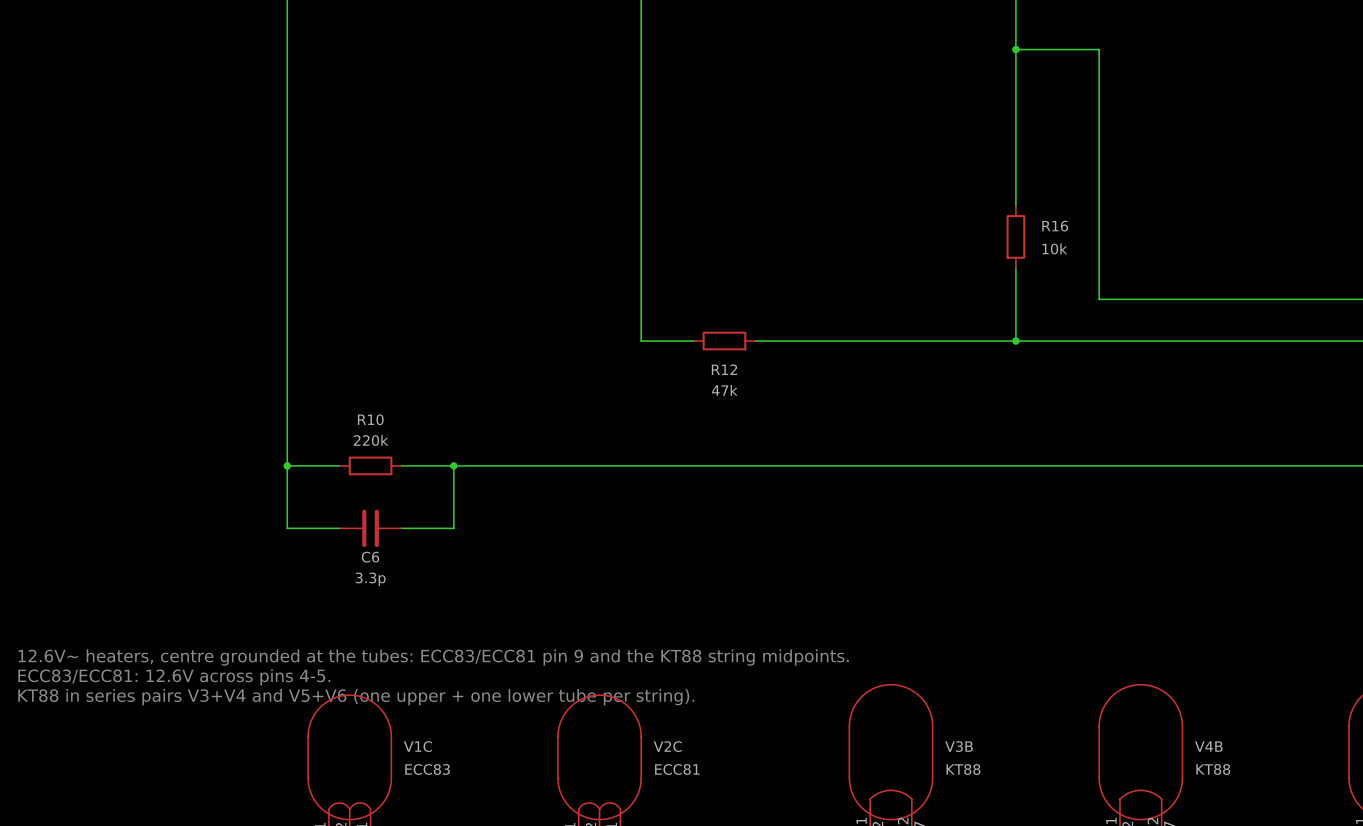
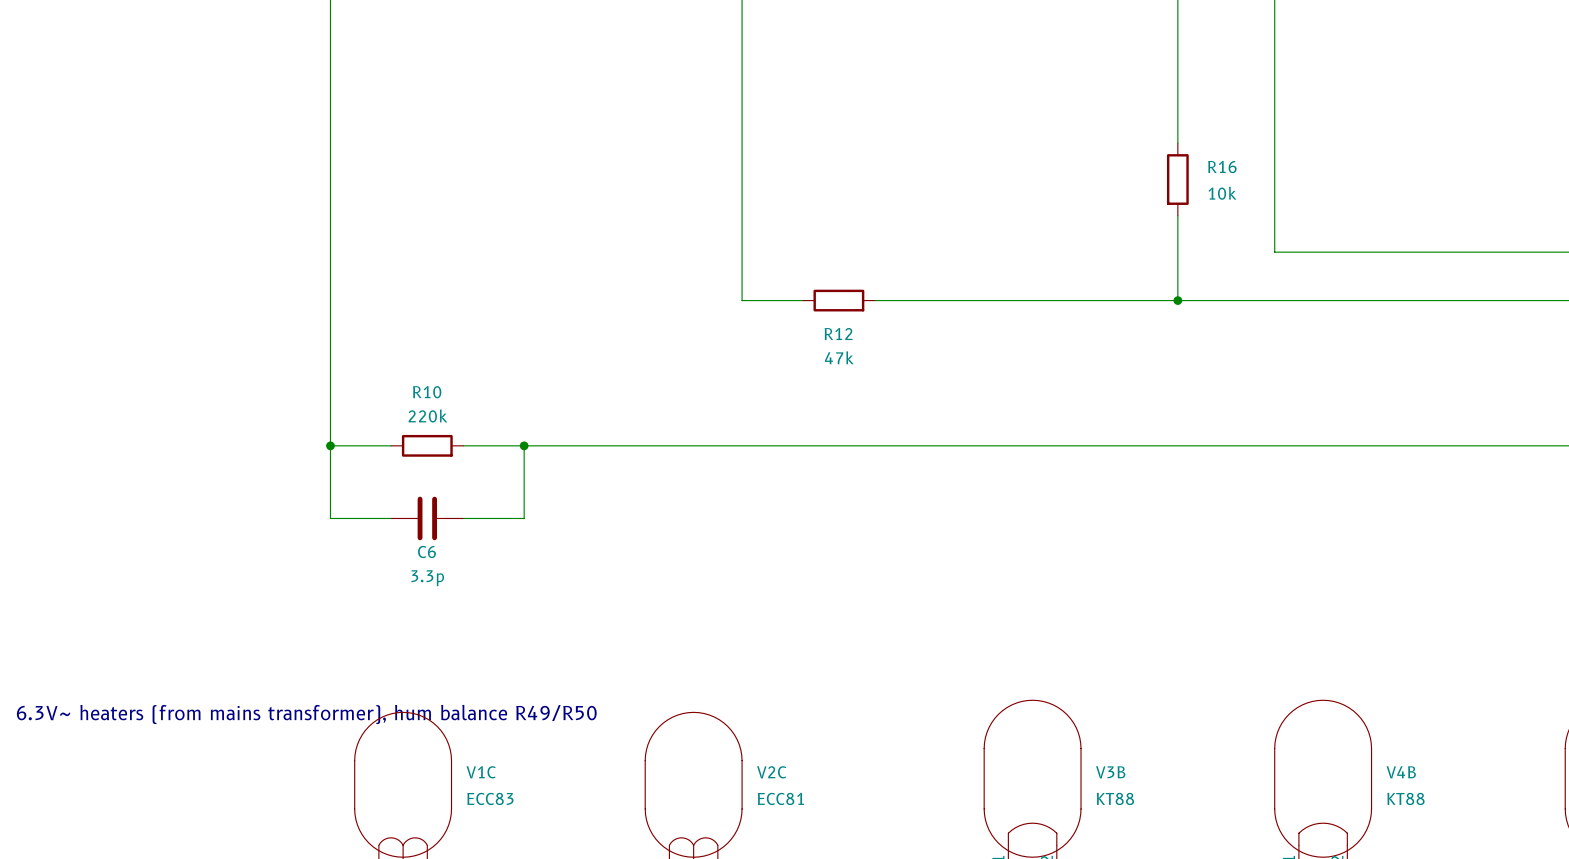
text: 12.6V~ heaters, centre grounded at the tubes: ECC83/ECC81 pin 9 and the KT88 string midpoints. (433, 657) -> none
text: ECC83/ECC81: 12.6V across pins 4-5. (174, 677) -> none
text: KT88 in series pairs V3+V4 and V5+V6 (one upper + one lower tube per string). (356, 697) -> 6.3V~ heaters (from mains transformer), hum balance R49/R50 (306, 714)

